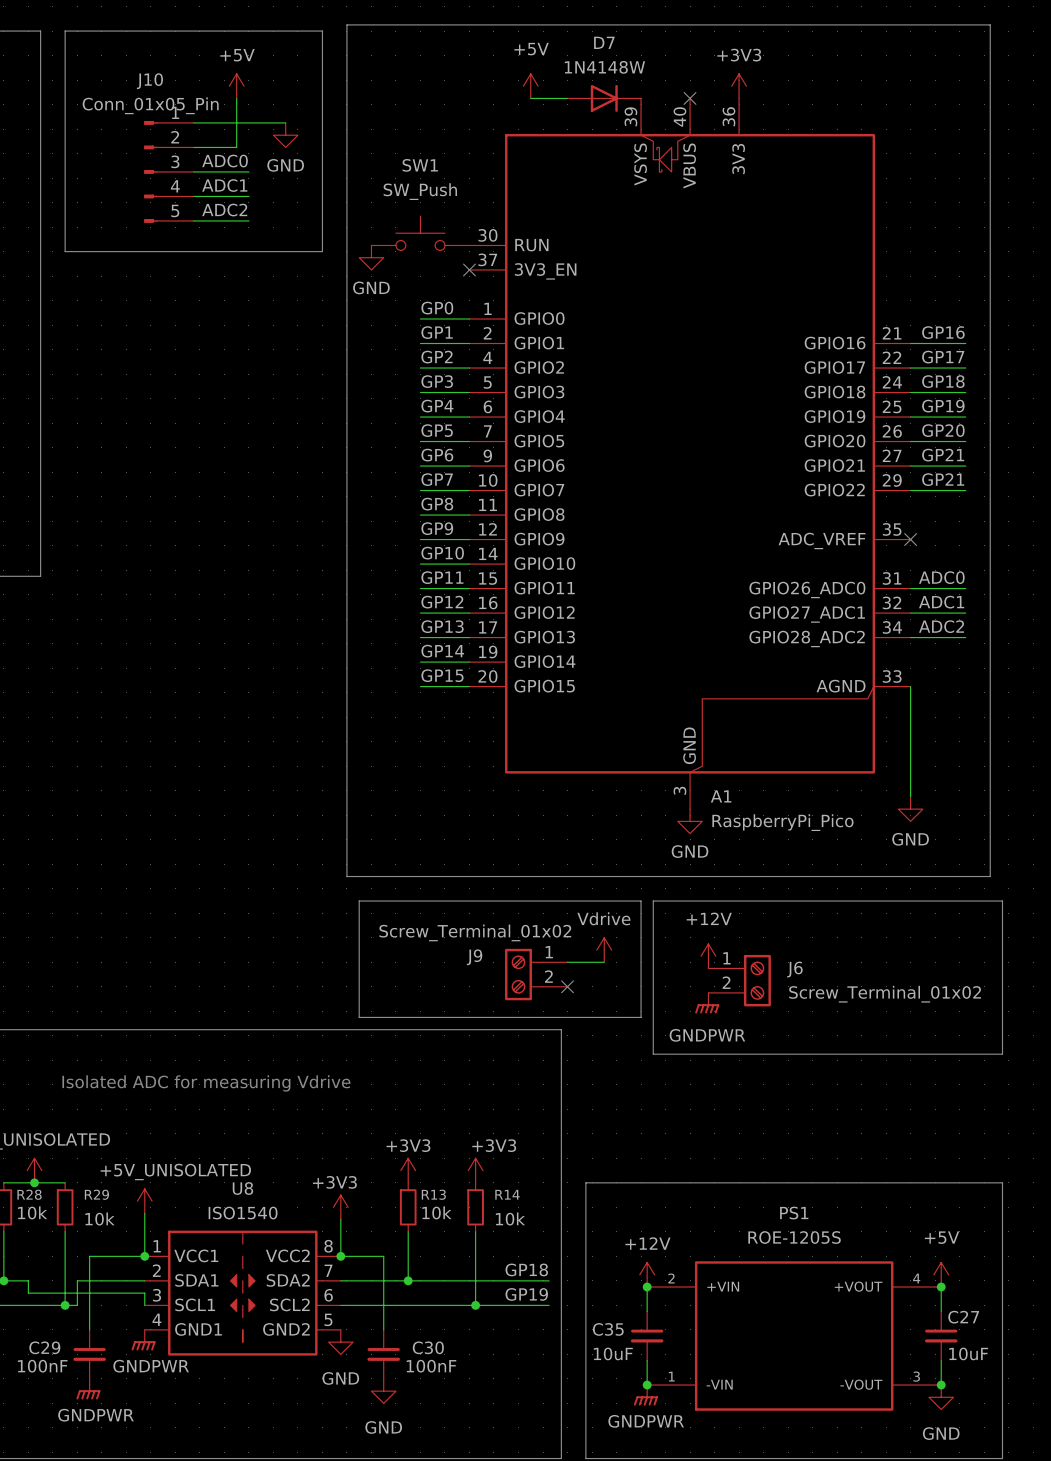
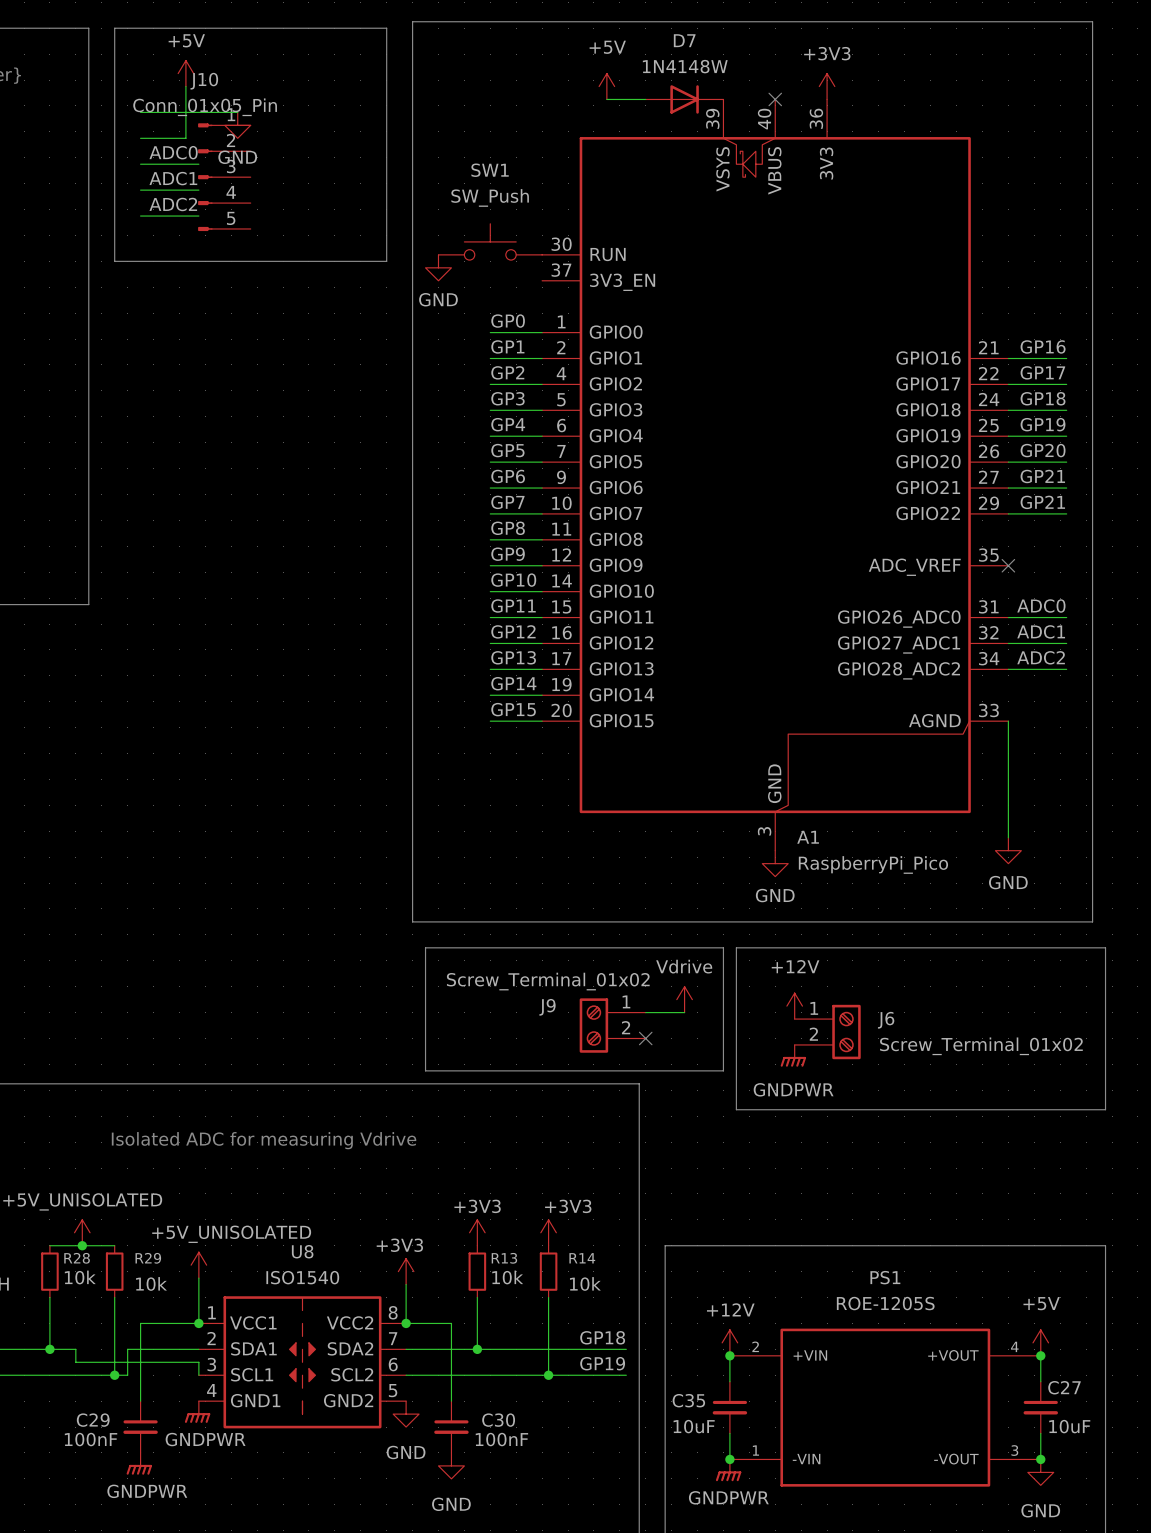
power symbol position: +5V (236, 86) -> +5V (185, 73)
wire: (236, 98) (236, 147) (193, 147) -> (185, 86) (185, 138) (140, 138)
wire: (193, 122) (285, 122) -> (140, 112) (237, 112)
power symbol position: GND (285, 135) -> GND (237, 125)
label position: ADC0 (225, 161) -> ADC0 (173, 152)
wire: (193, 171) (248, 171) -> (140, 164) (198, 164)
label position: ADC1 (224, 185) -> ADC1 (173, 178)
wire: (193, 196) (248, 196) -> (140, 190) (198, 190)
label position: ADC2 (224, 210) -> ADC2 (173, 204)
wire: (193, 220) (248, 220) -> (140, 216) (198, 216)
no-connect mark: (469, 269) -> none

